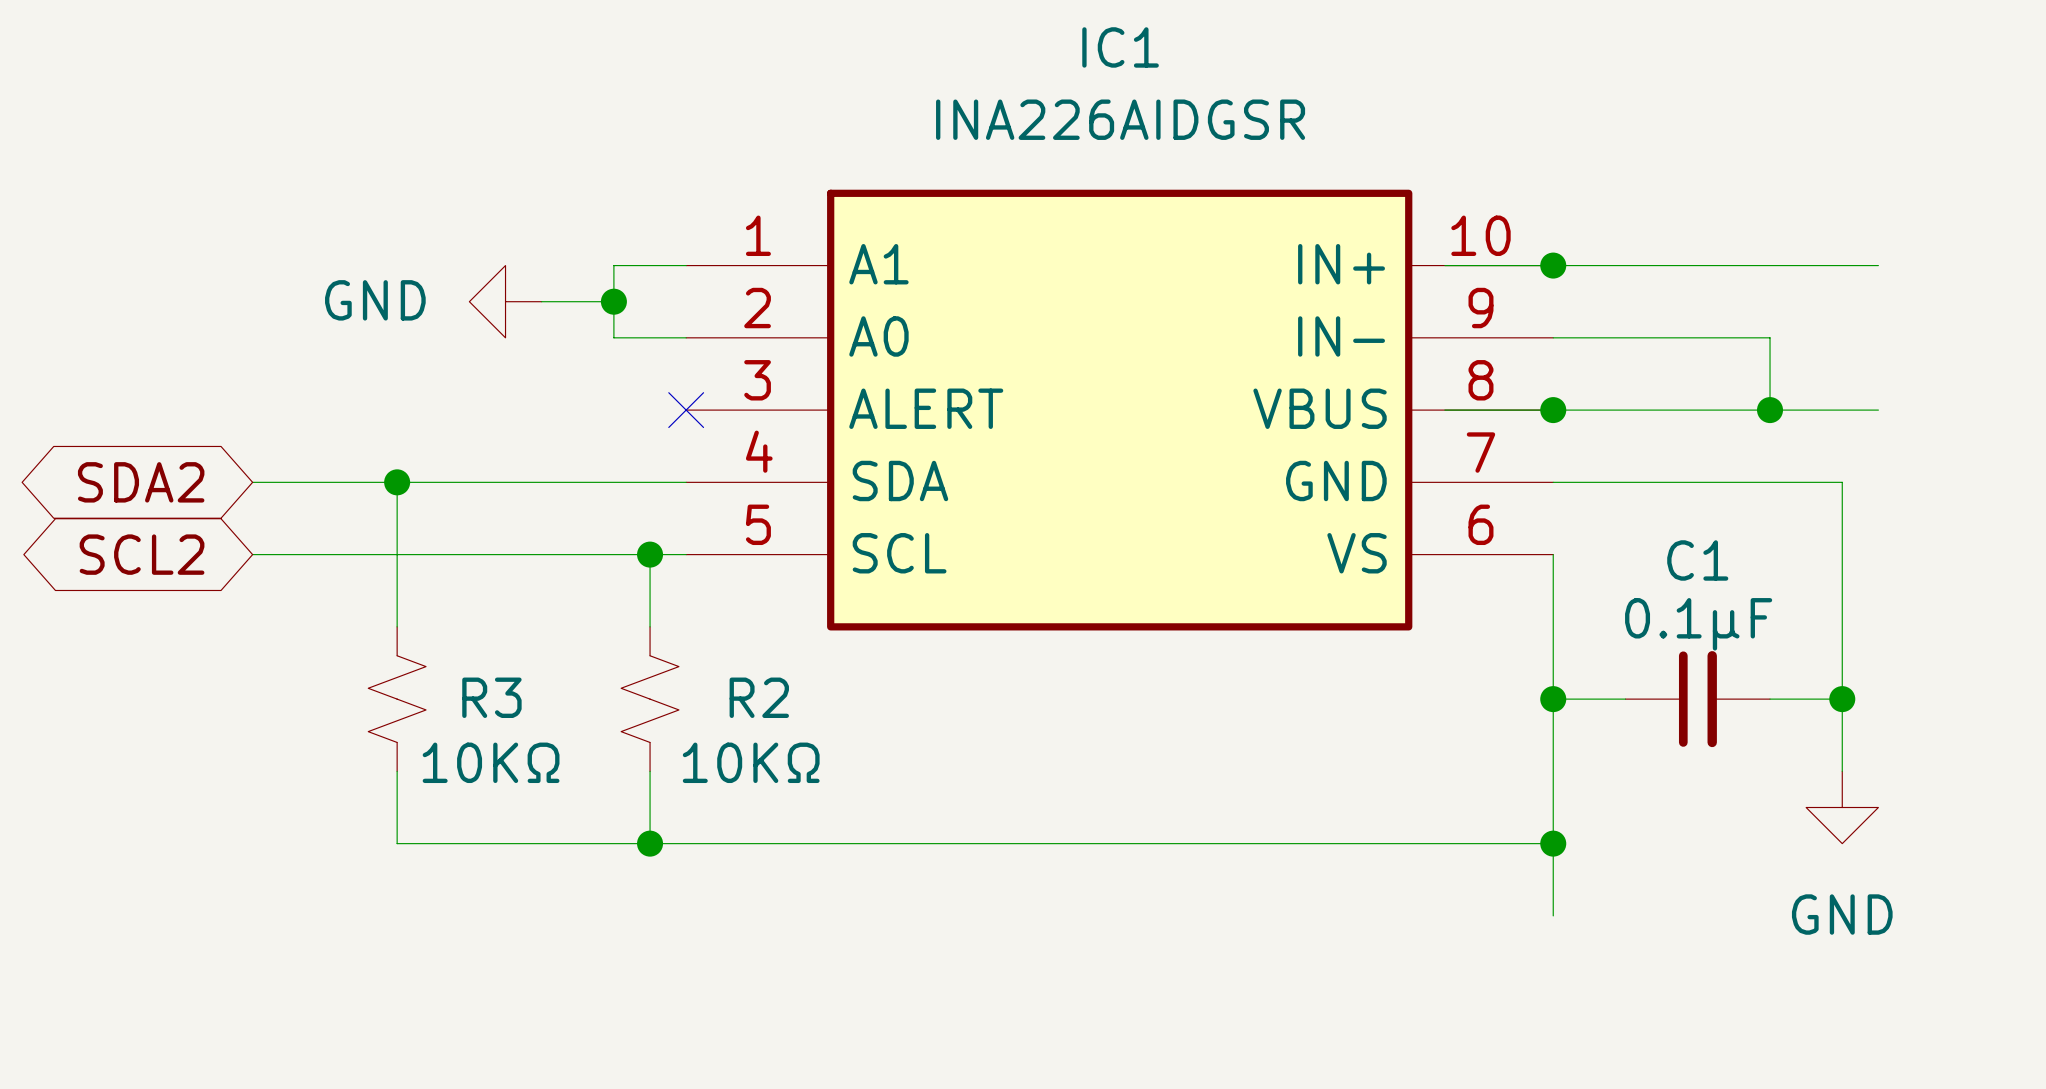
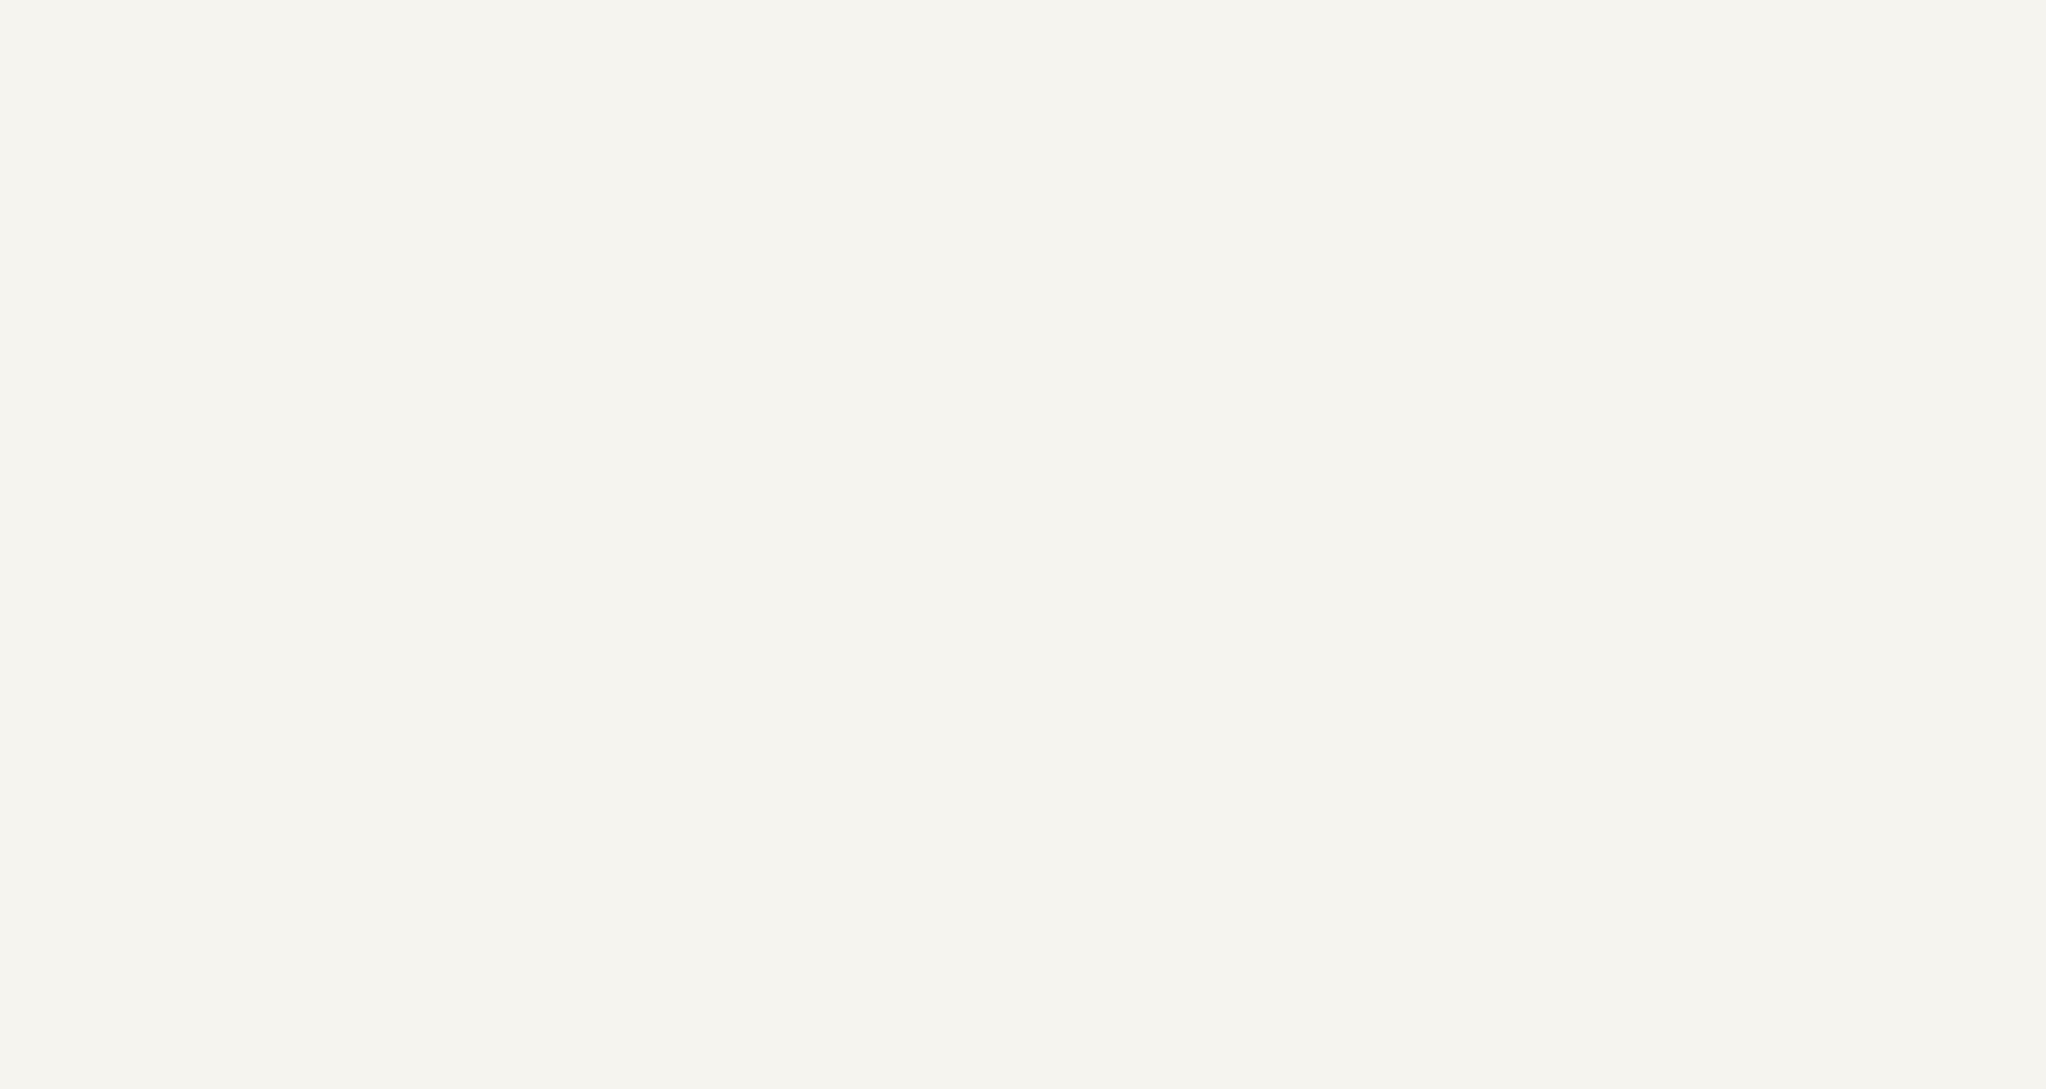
wire: (686, 265) (613, 265) (613, 337) (686, 337) -> none
wire: (1444, 265) (1878, 265) -> none
junction: (1553, 265) -> none
power symbol: GND (505, 301) -> none
wire: (541, 301) (613, 301) -> none
junction: (613, 301) -> none
wire: (1553, 337) (1770, 337) (1770, 410) -> none
no-connect mark: (686, 410) -> none
IC1: INA226AIDGSR (1119, 410) -> none
wire: (1444, 410) (1878, 410) -> none
junction: (1553, 410) -> none
junction: (1770, 410) -> none
global label: SDA2 (141, 482) -> none
wire: (252, 482) (686, 482) -> none
wire: (397, 482) (397, 626) -> none
junction: (397, 482) -> none
wire: (1553, 482) (1842, 482) (1842, 771) -> none
global label: SCL2 (142, 554) -> none
wire: (252, 554) (686, 554) -> none
wire: (650, 554) (650, 626) -> none
junction: (650, 554) -> none
wire: (1553, 554) (1553, 915) -> none
R3: 10KΩ (397, 699) -> none
R2: 10KΩ (650, 699) -> none
wire: (1553, 699) (1625, 699) -> none
junction: (1553, 699) -> none
C1: 0.1μF (1697, 699) -> none
wire: (1770, 699) (1842, 699) -> none
junction: (1842, 699) -> none
wire: (397, 771) (397, 843) (1553, 843) -> none
wire: (650, 771) (650, 843) -> none
power symbol: GND (1842, 807) -> none
junction: (650, 843) -> none
junction: (1553, 843) -> none

